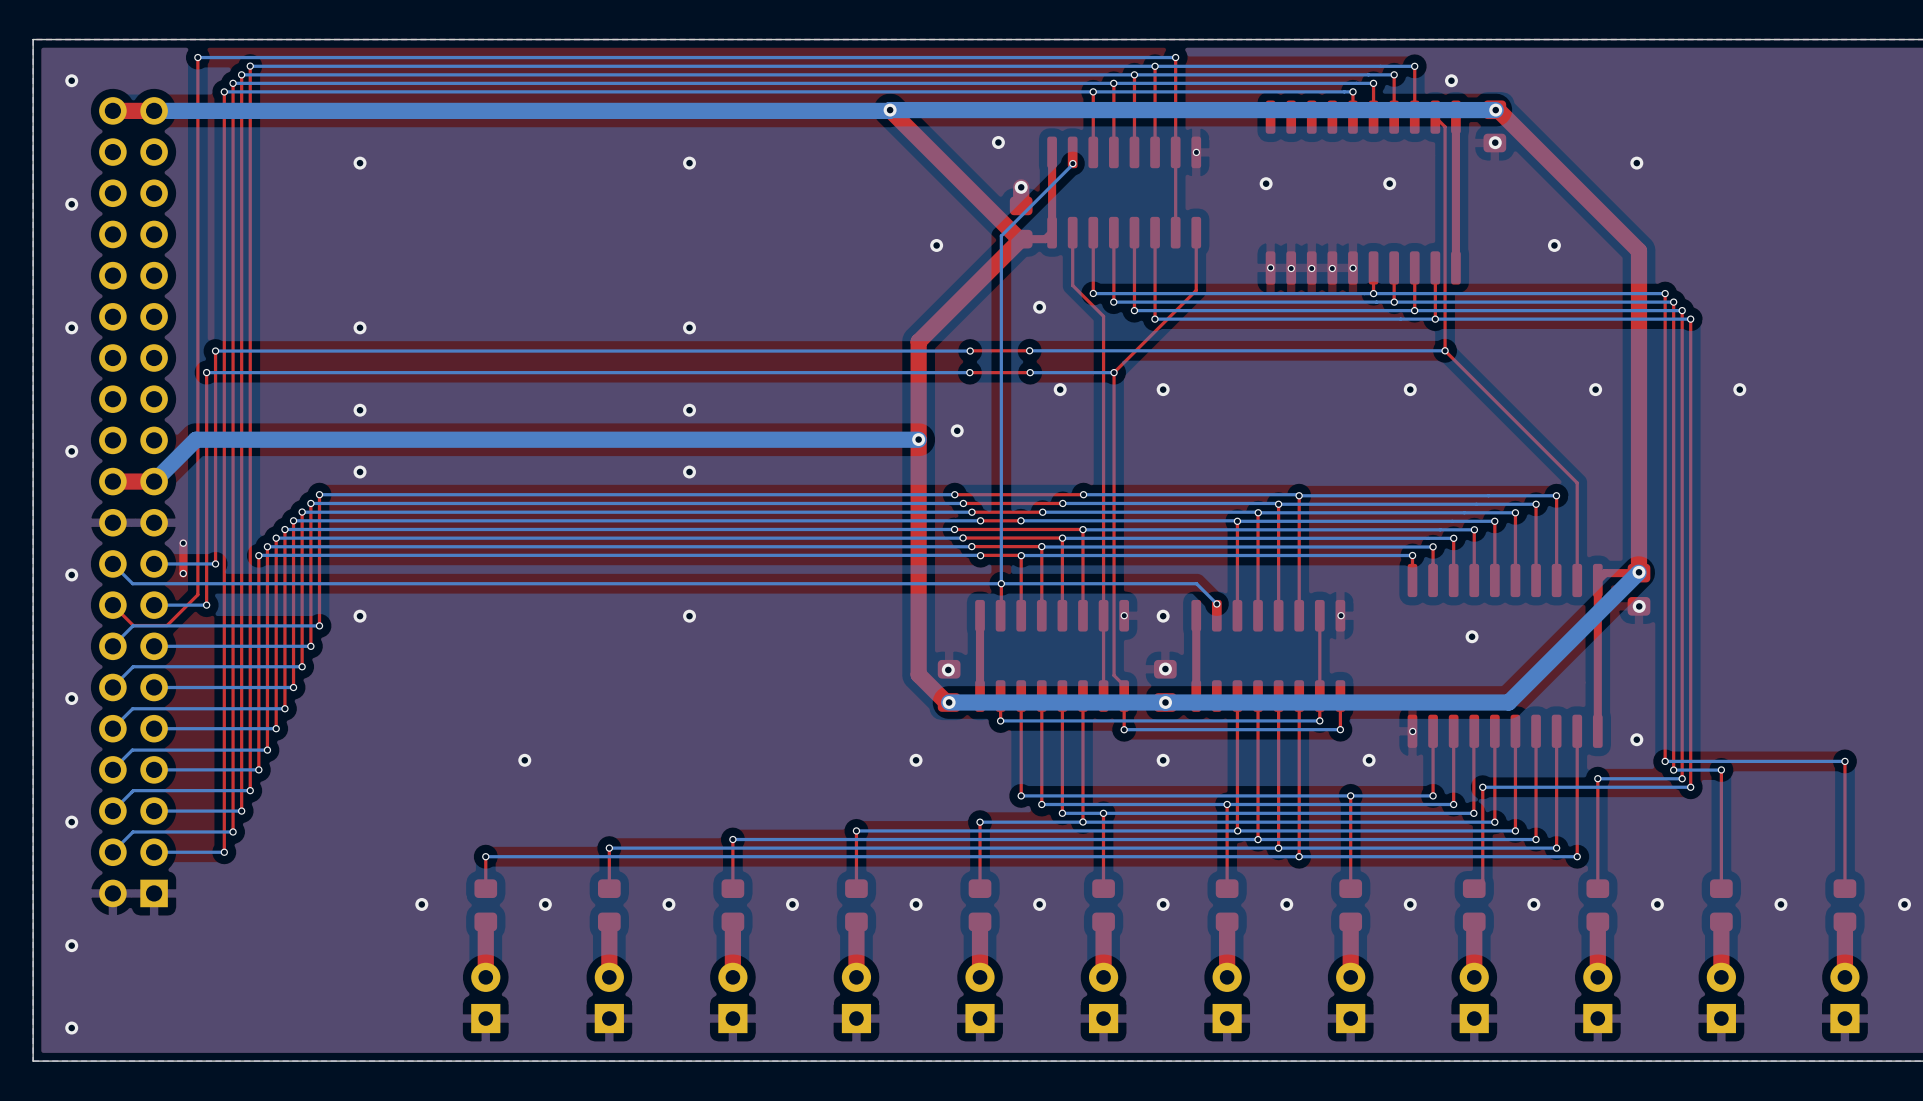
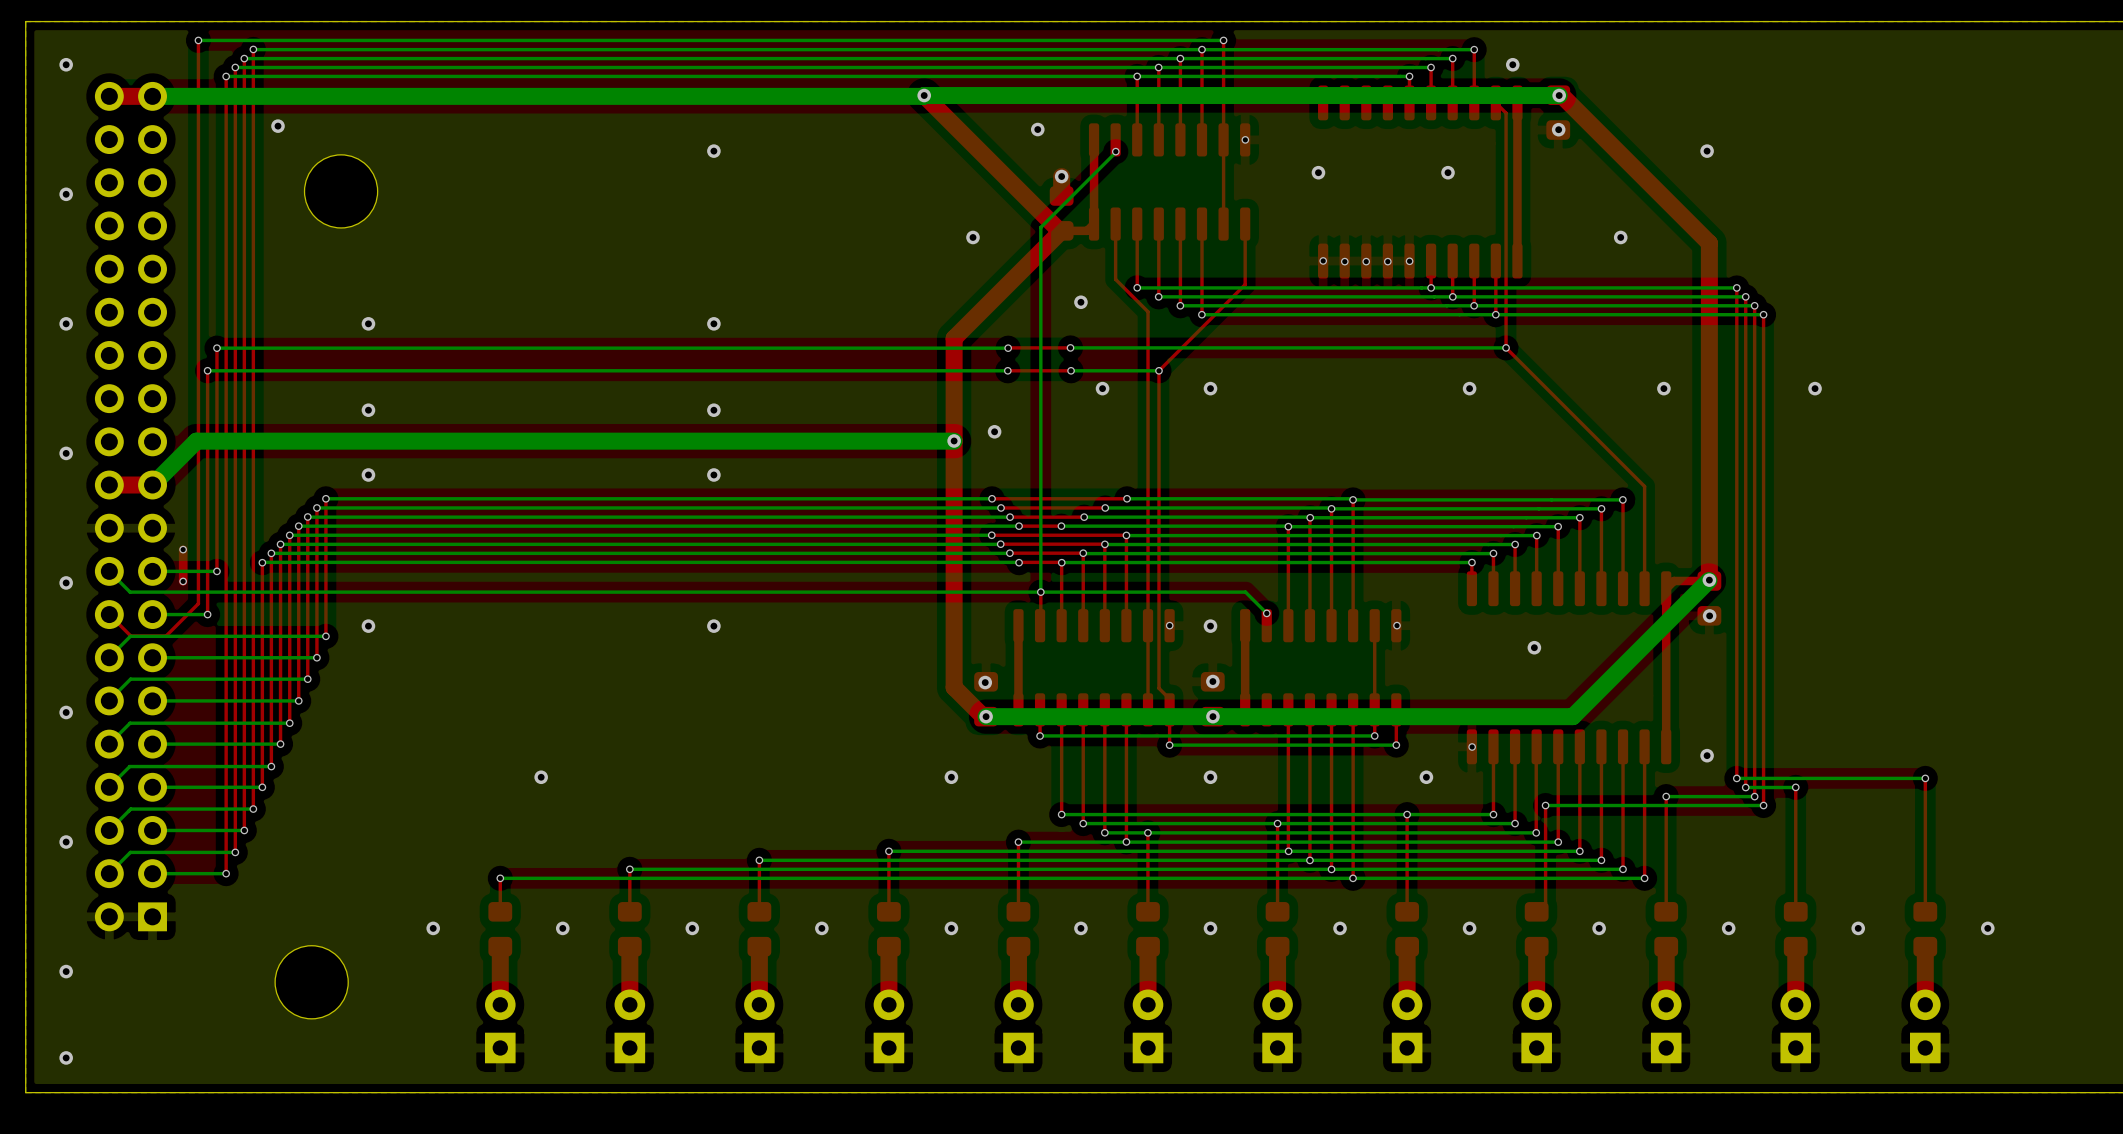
via position: (360, 163) -> (278, 126)
part: none -> (341, 191)
part: none -> (311, 982)

